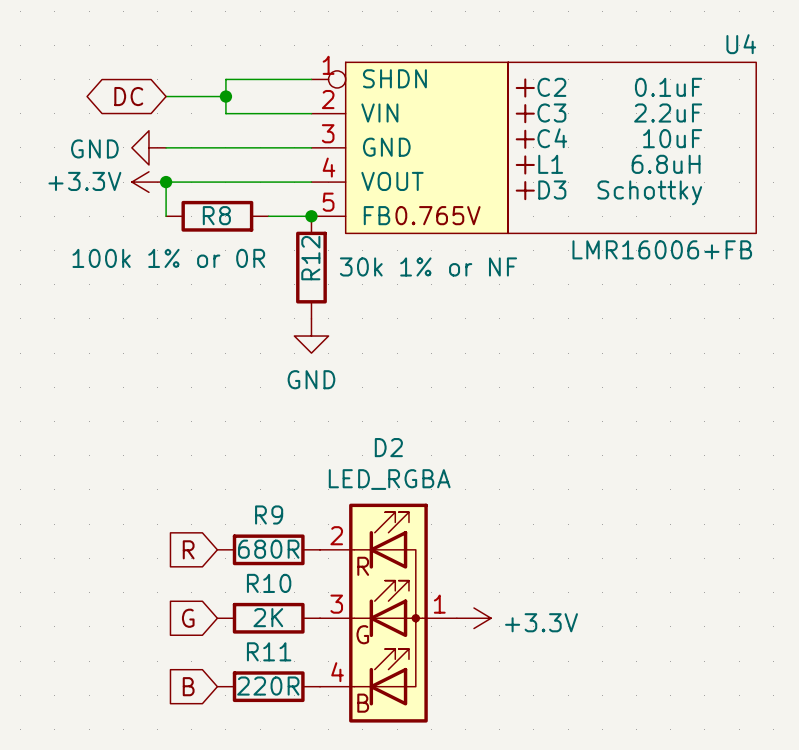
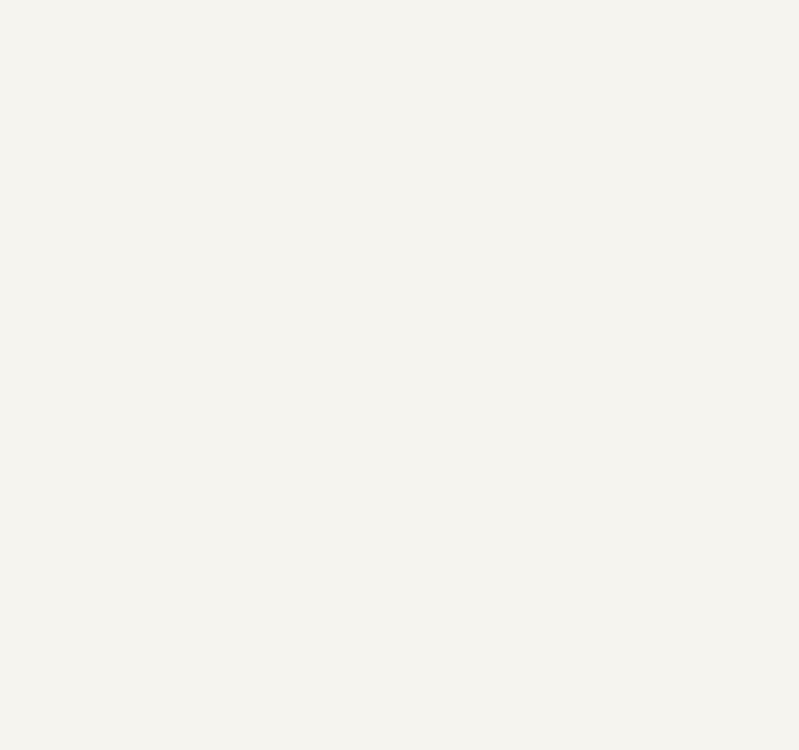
wire: (311, 79) (225, 79) (225, 113) (311, 113) -> none
C2: 0.1uF (525, 87) -> none
global label: DC (128, 96) -> none
wire: (166, 96) (225, 96) -> none
junction: (225, 96) -> none
C3: 2.2uF (525, 113) -> none
C4: 10uF (525, 139) -> none
power symbol: GND (148, 147) -> none
wire: (166, 147) (311, 147) -> none
U4: LMR16006+FB (533, 147) -> none
L1: 6.8uH (525, 164) -> none
power symbol: +3.3V (148, 182) -> none
junction: (166, 182) -> none
wire: (311, 182) (166, 182) (166, 216) -> none
D3: Schottky (525, 190) -> none
R8: 100k 1% or 0R (217, 216) -> none
wire: (268, 216) (311, 216) -> none
junction: (311, 216) -> none
R12: 30k 1% or NF (311, 267) -> none
power symbol: GND (311, 336) -> none
global label: R (188, 549) -> none
R9: 680R (268, 549) -> none
D2: LED_RGBA (388, 613) -> none
global label: G (188, 618) -> none
R10: 2K (268, 618) -> none
power symbol: +3.3V (473, 618) -> none
global label: B (188, 686) -> none
R11: 220R (268, 686) -> none

